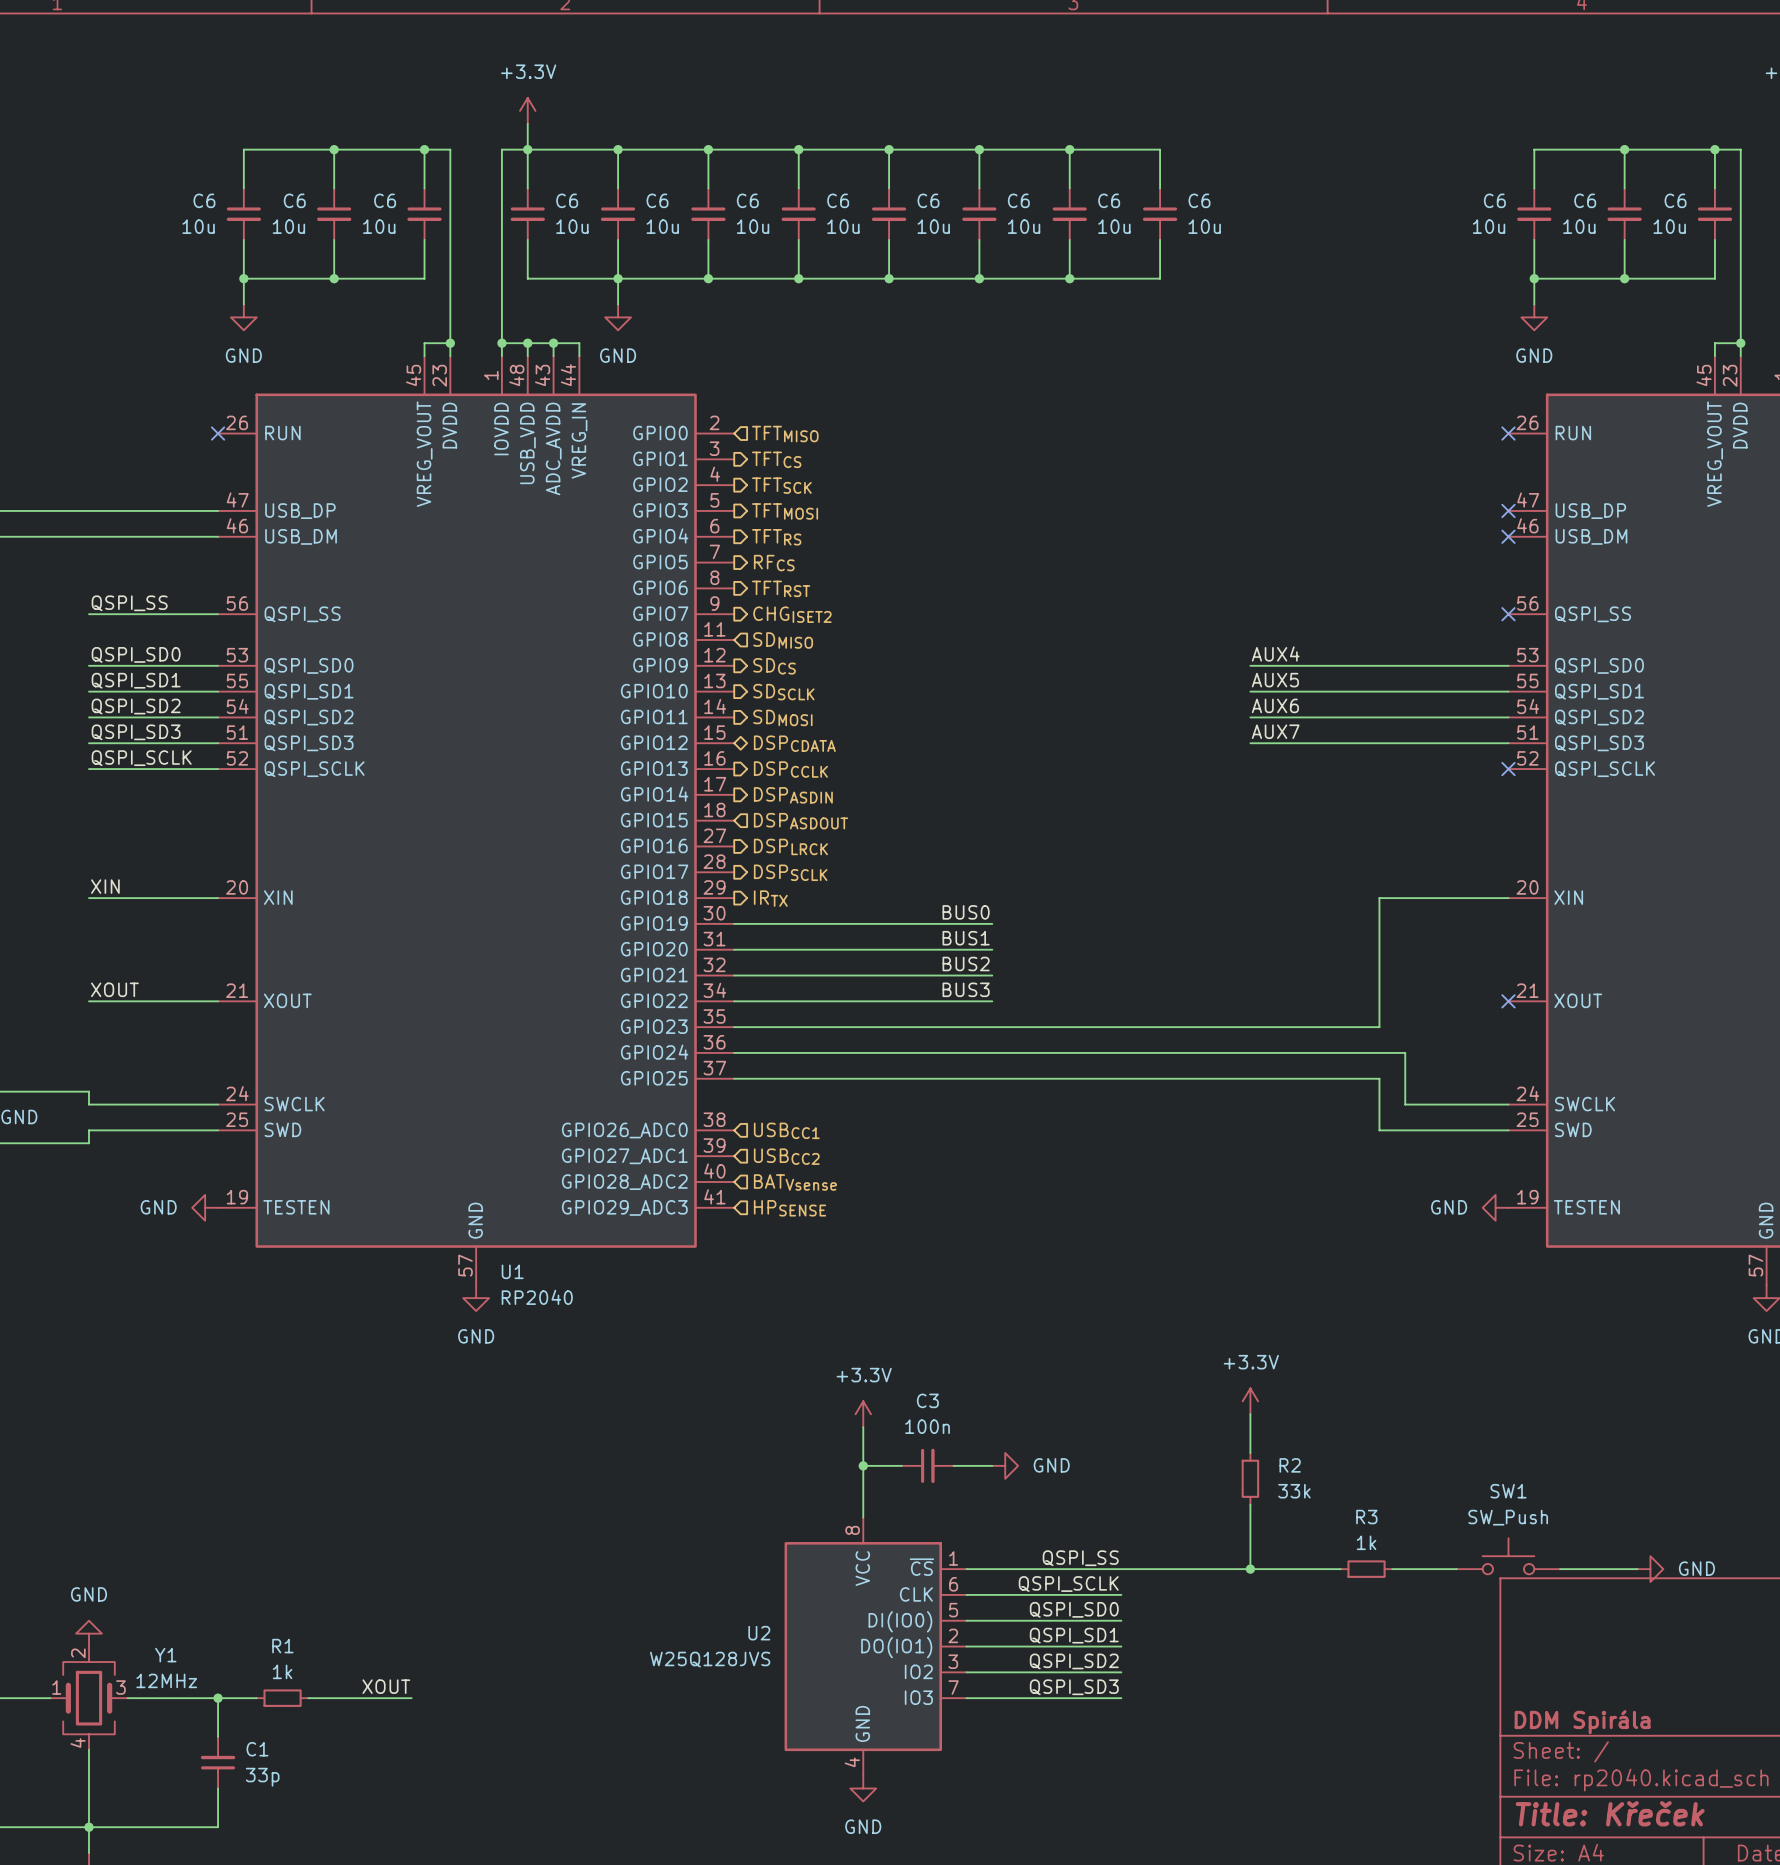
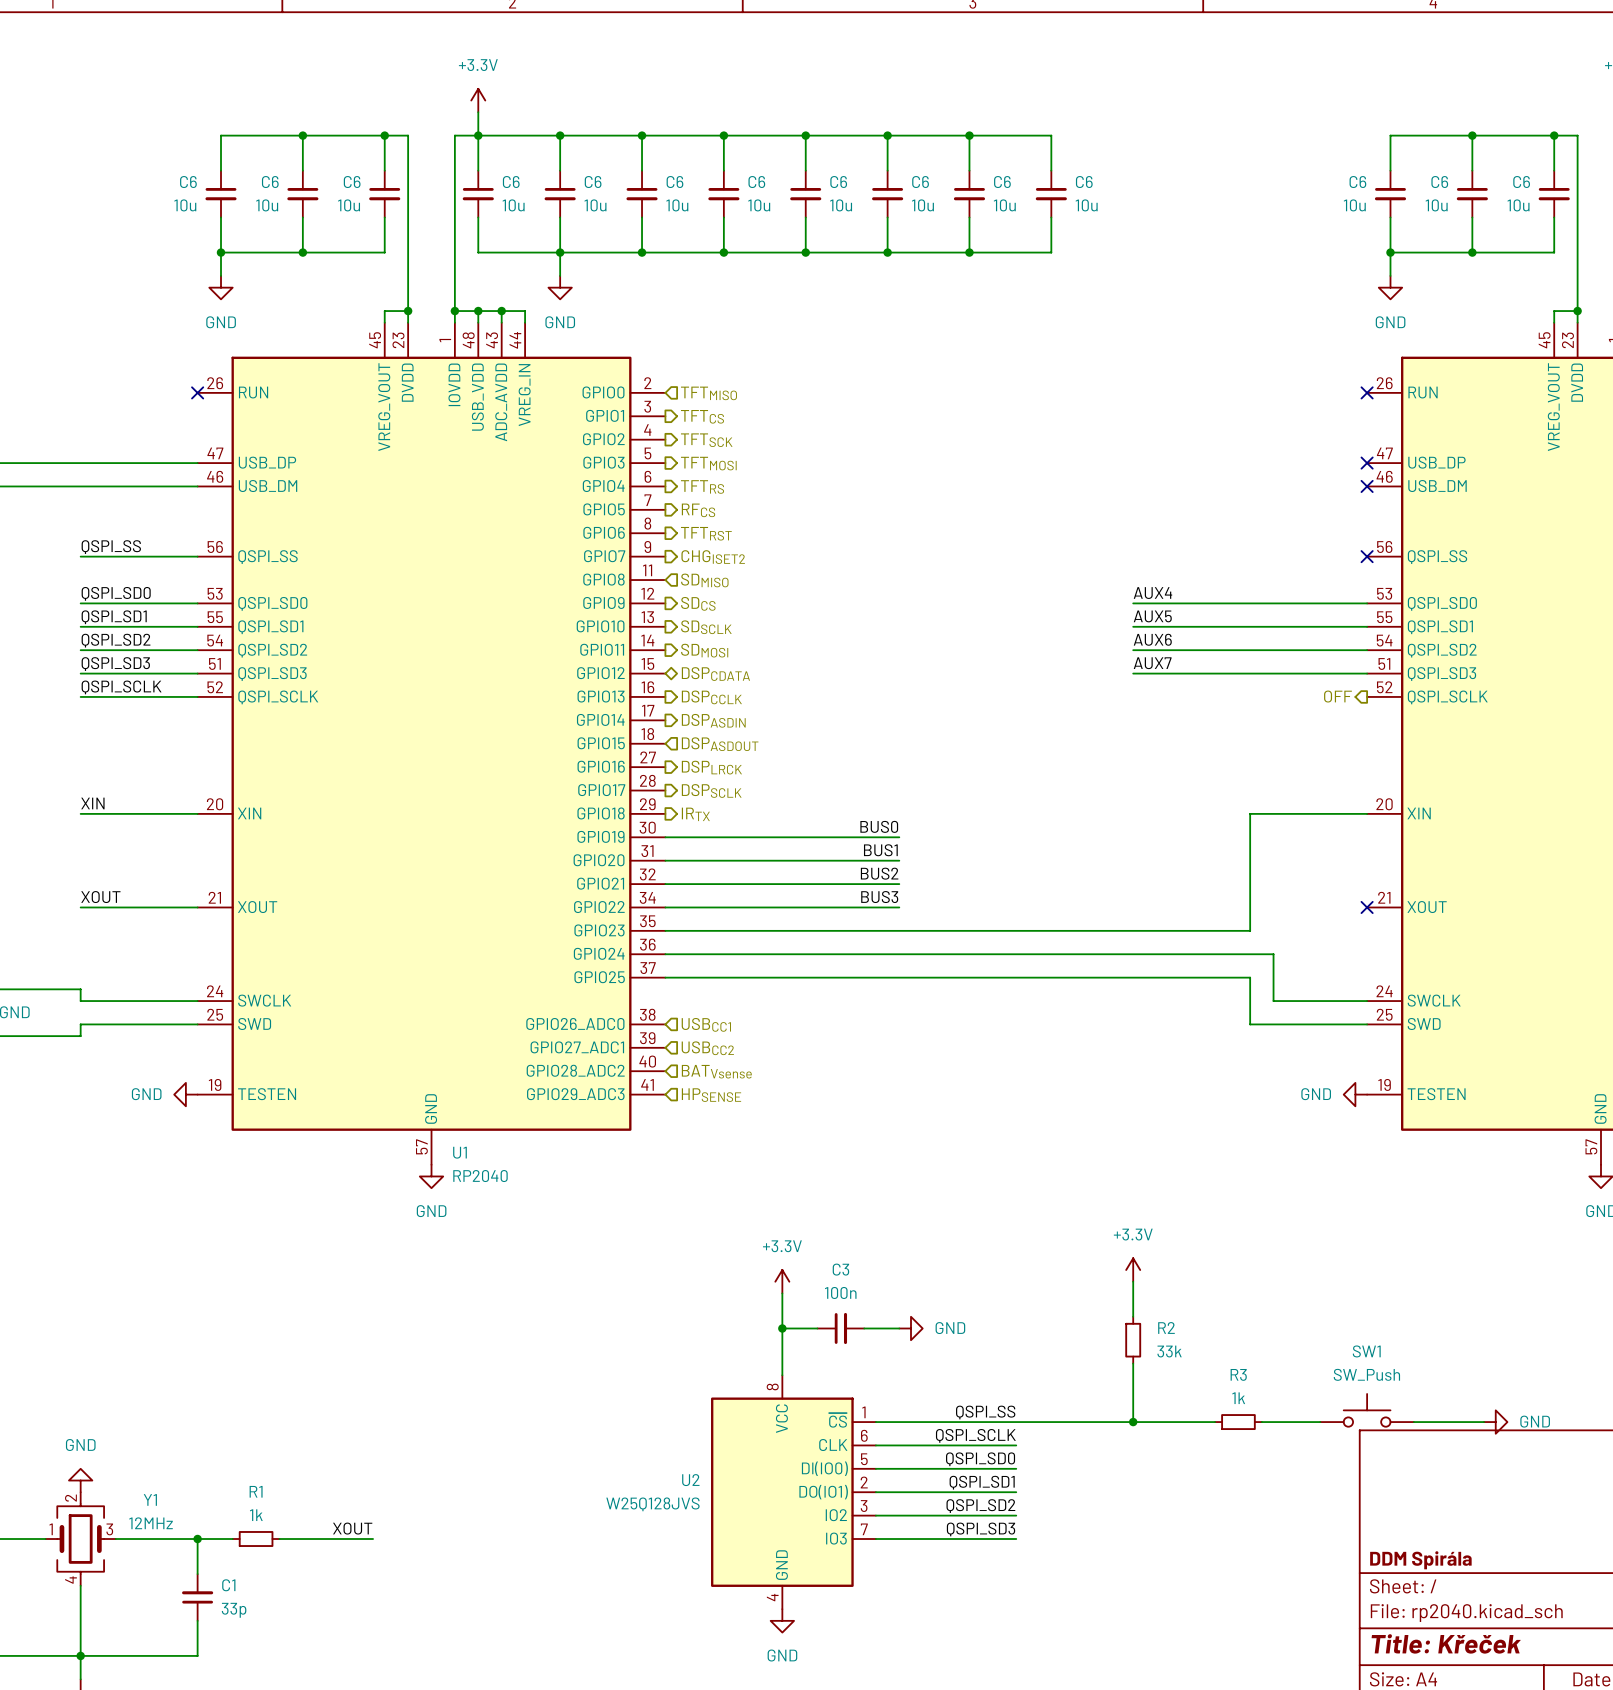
hierarchical label: none -> OFF (1337, 696)
no-connect mark: (1508, 769) -> none

